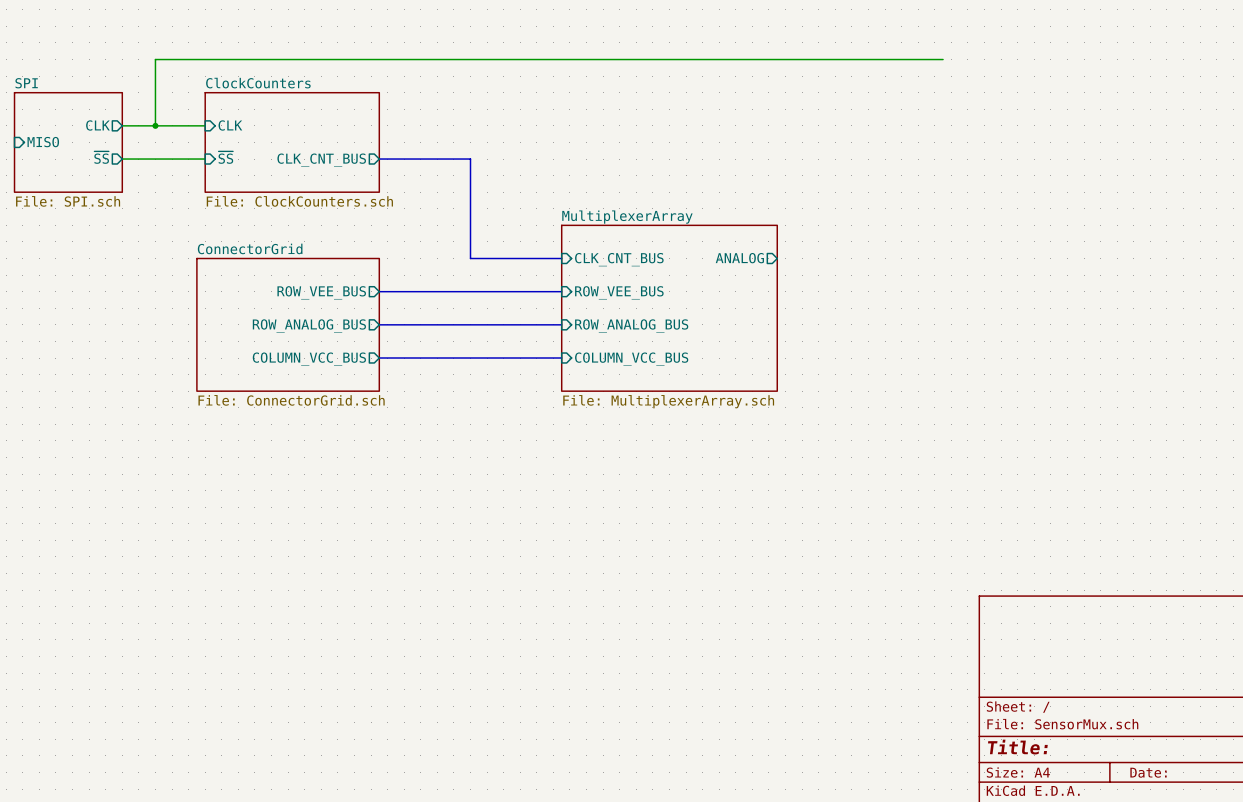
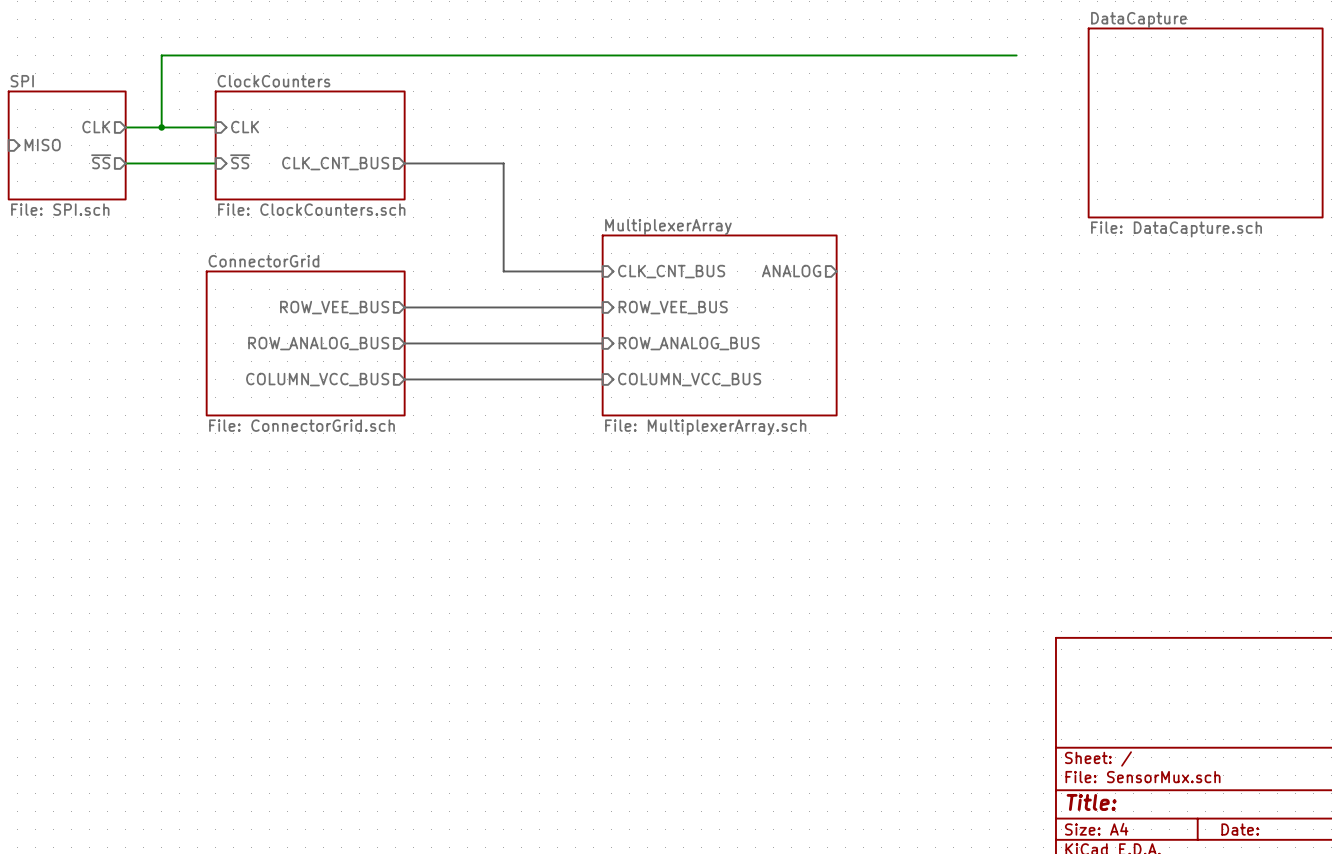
sheet DataCapture: none -> File: DataCapture.sch (1205, 122)

